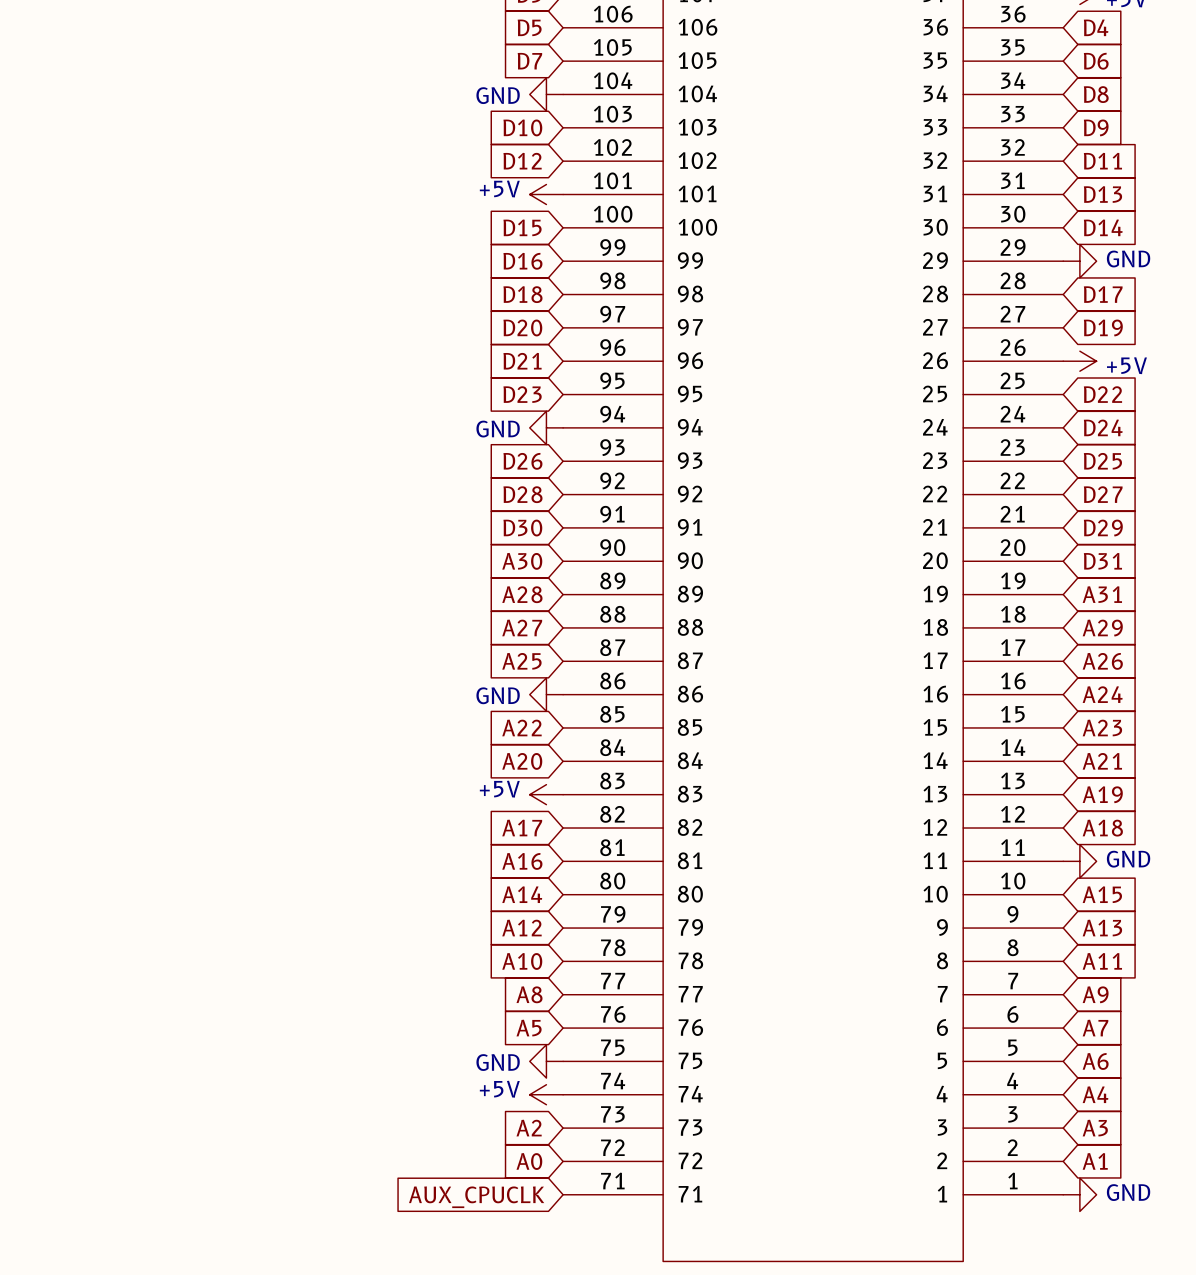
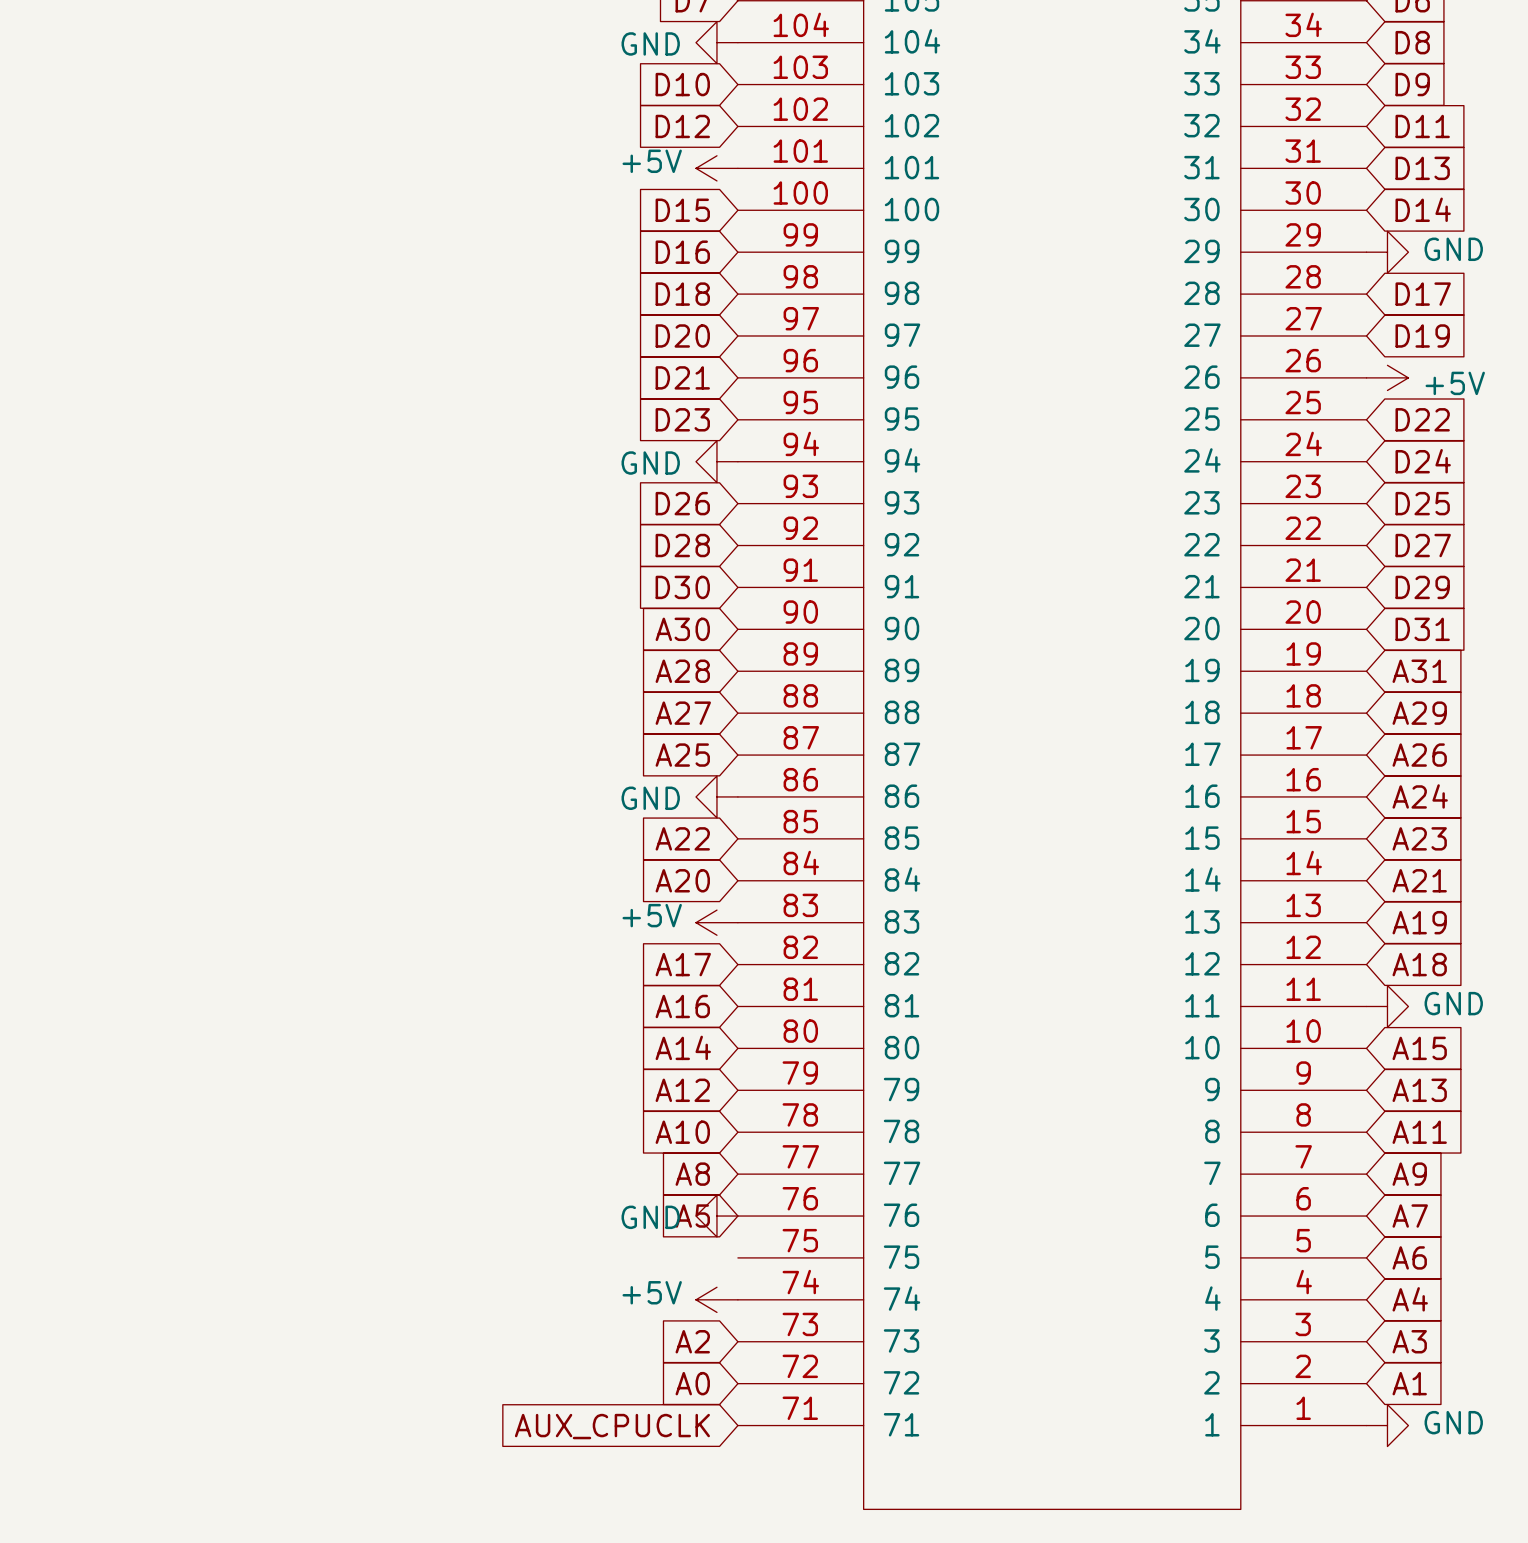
power symbol position: GND (546, 1061) -> GND (716, 1216)

